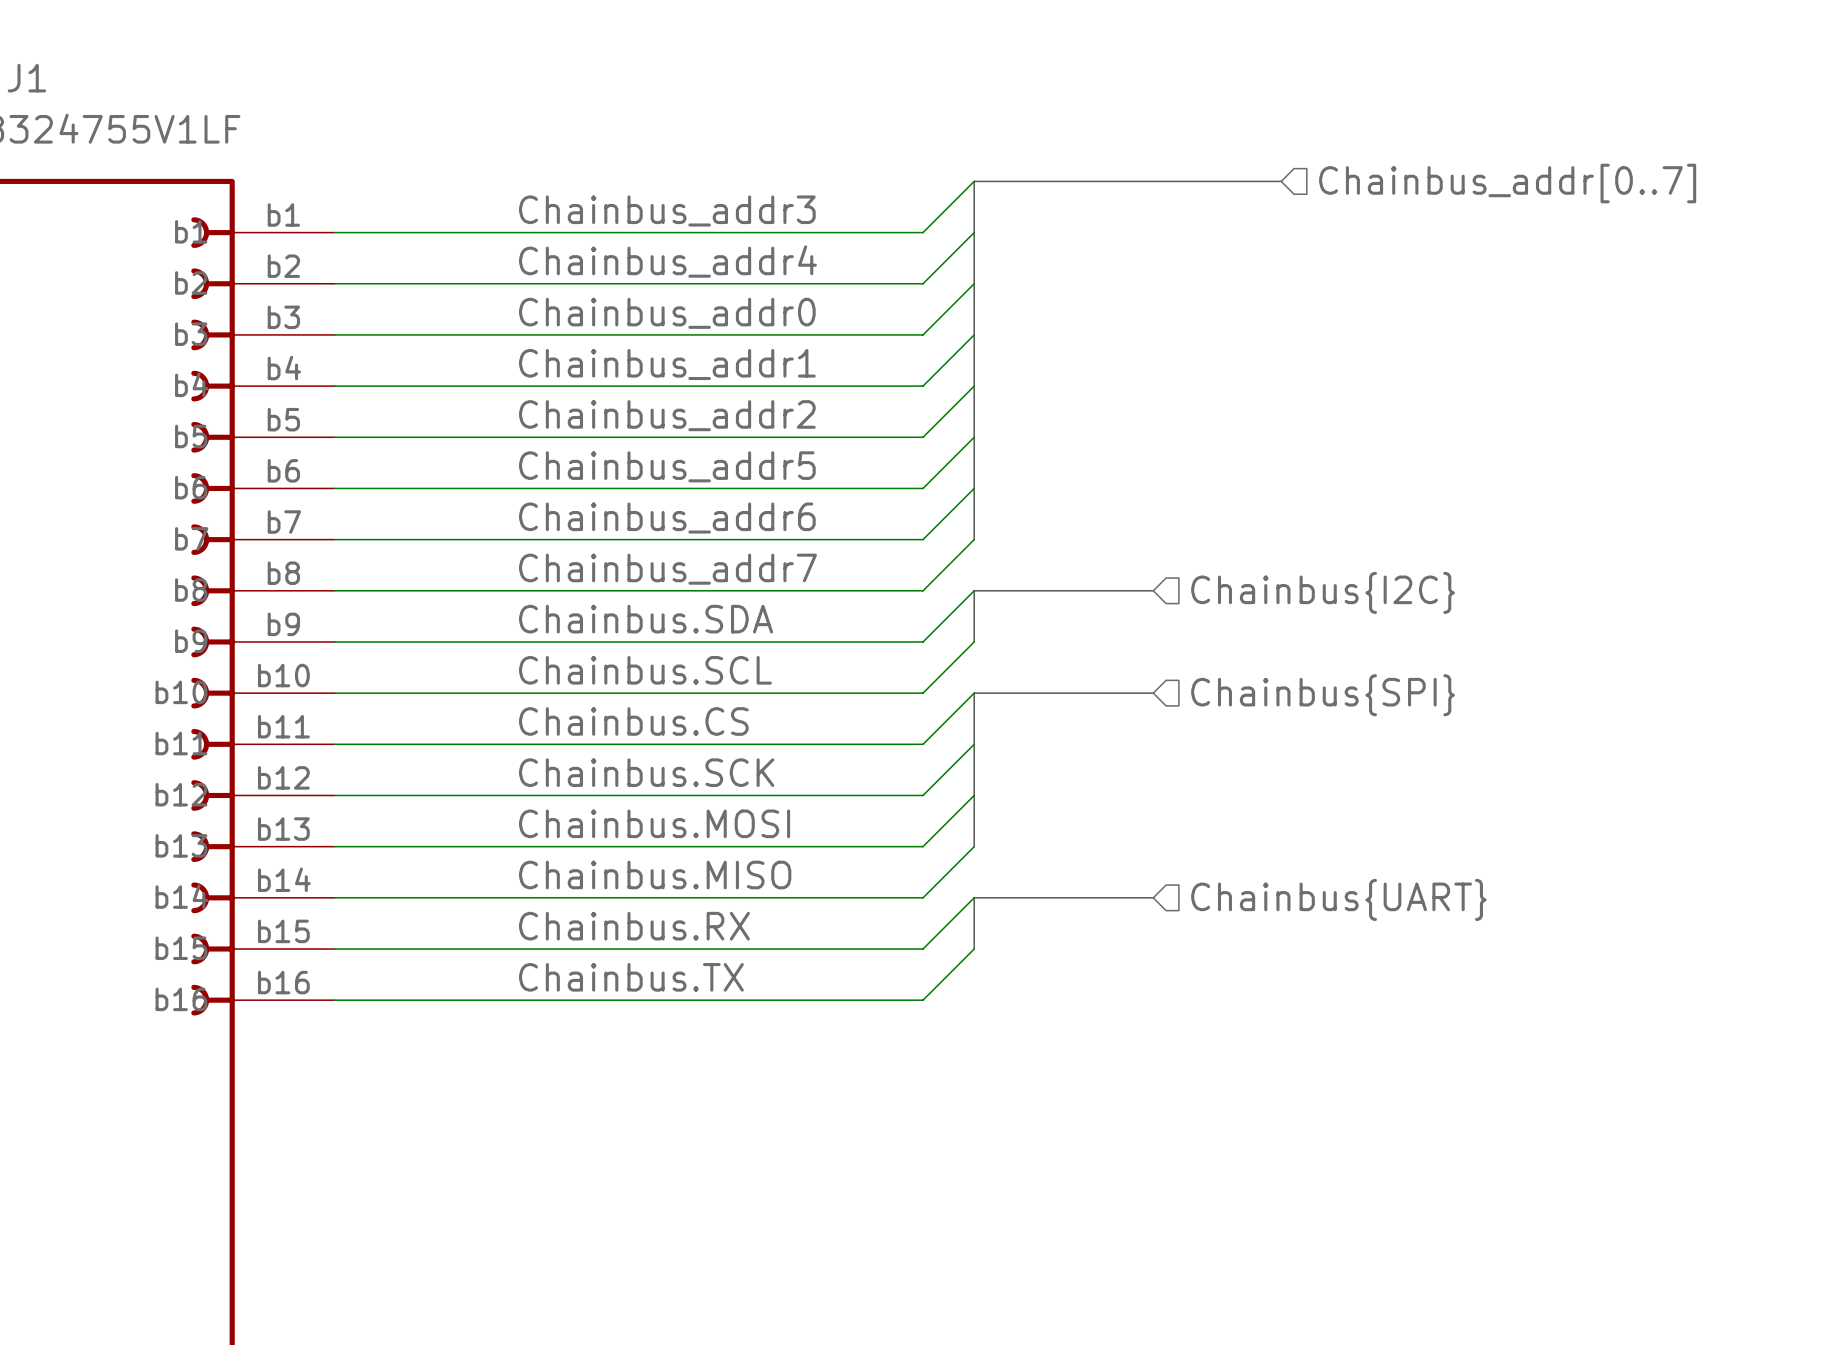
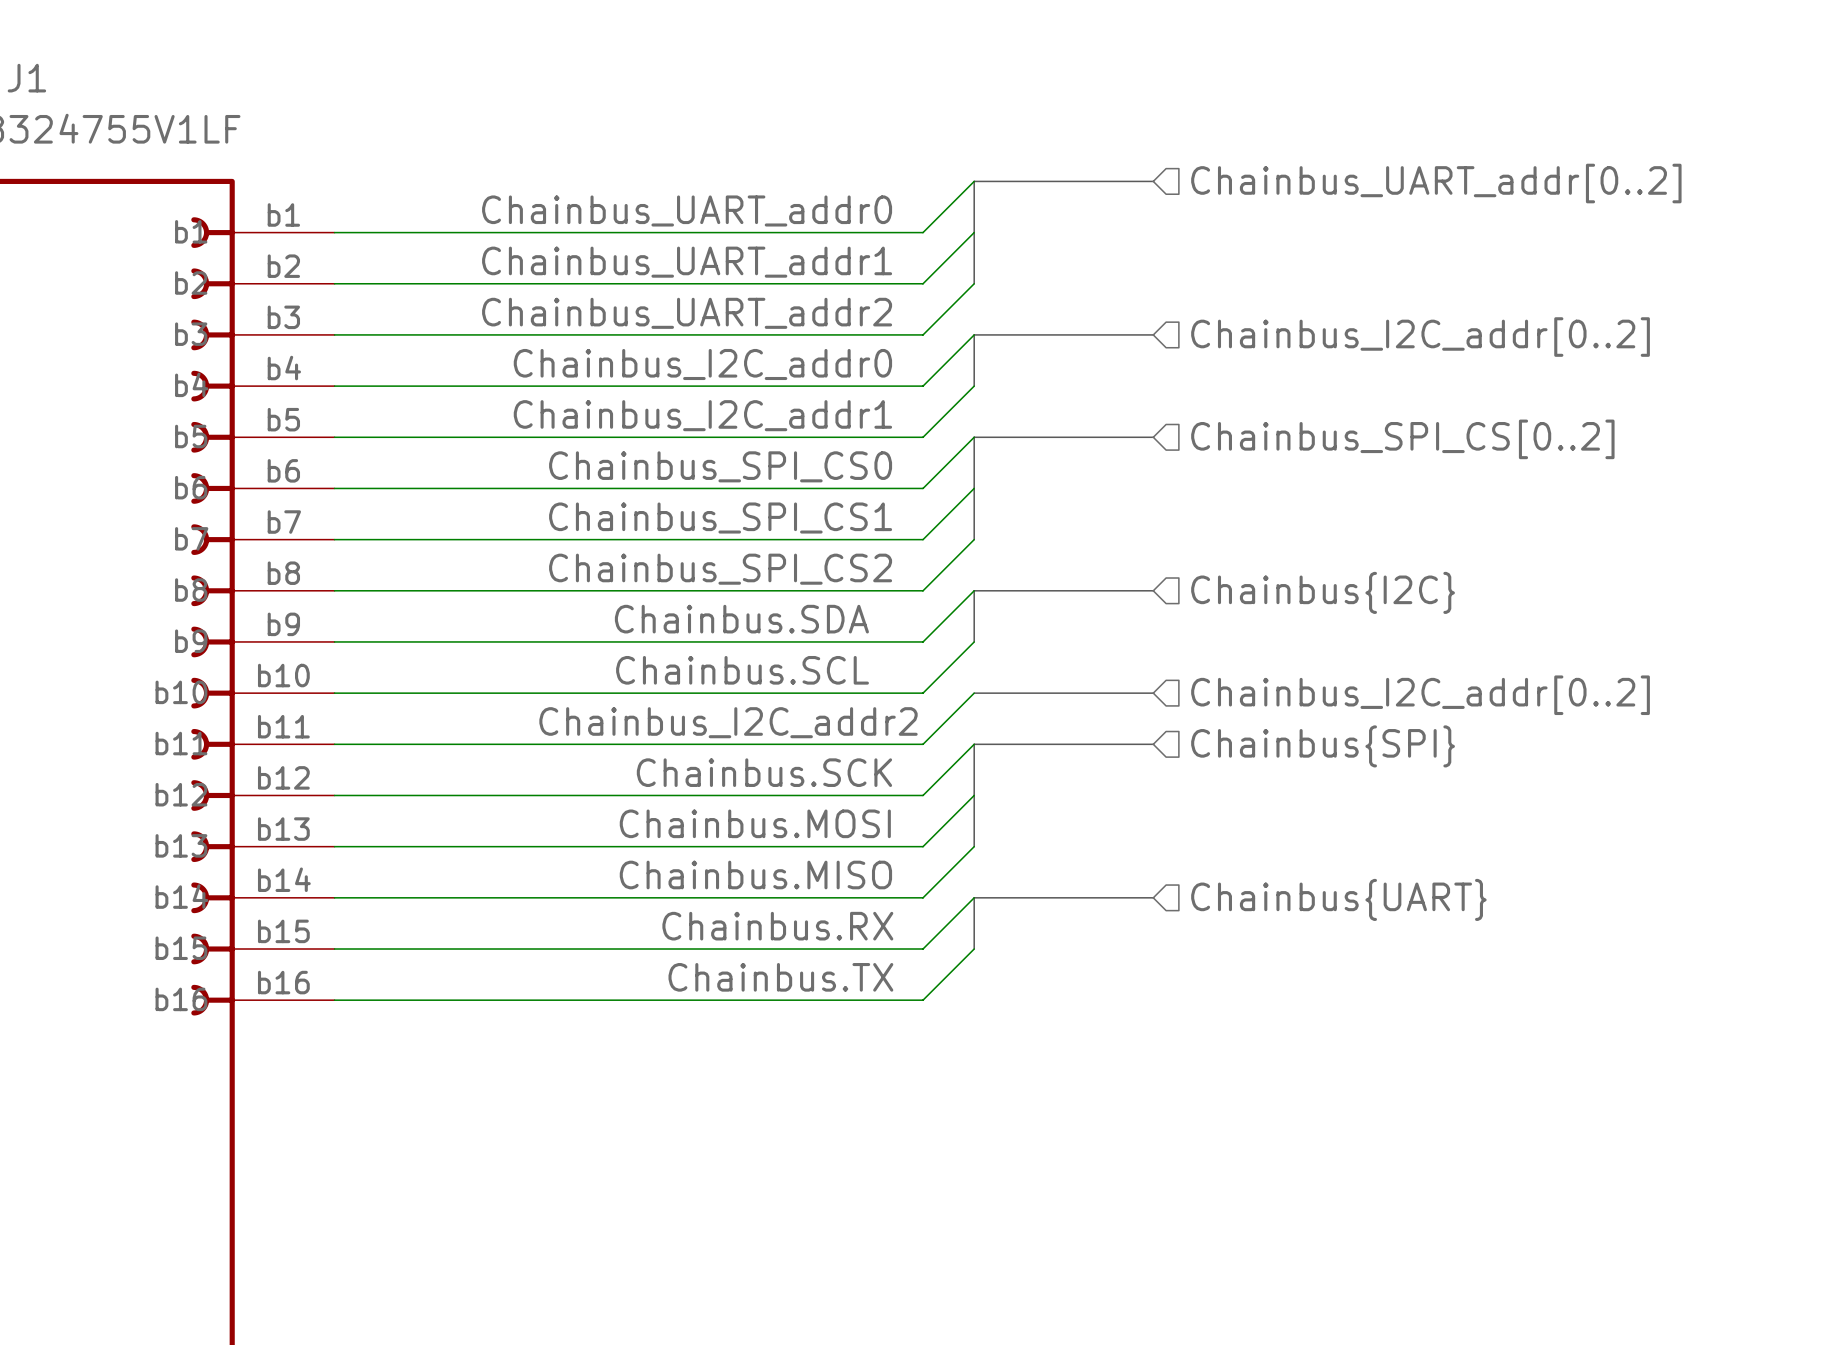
bus: (1153, 181) (1281, 181) -> none
hierarchical label: Chainbus_addr[0..7] (1507, 183) -> Chainbus_UART_addr[0..2] (1436, 183)
label: Chainbus_addr3 (667, 210) -> none
label: none -> Chainbus_UART_addr0 (687, 210)
label: Chainbus_addr4 (667, 261) -> none
label: none -> Chainbus_UART_addr1 (687, 262)
bus: (974, 283) (974, 334) -> (1153, 334) (974, 334)
label: Chainbus_addr0 (667, 313) -> none
label: none -> Chainbus_UART_addr2 (687, 313)
hierarchical label: none -> Chainbus_I2C_addr[0..2] (1420, 337)
label: Chainbus_addr1 (667, 364) -> none
label: none -> Chainbus_I2C_addr0 (702, 364)
bus: (974, 386) (974, 437) -> (1153, 437) (974, 437)
label: Chainbus_addr2 (667, 415) -> none
label: none -> Chainbus_I2C_addr1 (702, 415)
hierarchical label: none -> Chainbus_SPI_CS[0..2] (1402, 439)
label: Chainbus_addr5 (667, 466) -> none
label: none -> Chainbus_SPI_CS0 (720, 466)
label: Chainbus_addr6 (667, 518) -> none
label: none -> Chainbus_SPI_CS1 (720, 518)
label: Chainbus_addr7 (667, 569) -> none
label: none -> Chainbus_SPI_CS2 (720, 569)
label position: Chainbus.SDA (646, 619) -> Chainbus.SDA (741, 619)
label position: Chainbus.SCL (645, 670) -> Chainbus.SCL (742, 670)
bus: (974, 693) (974, 744) -> (1153, 744) (974, 744)
hierarchical label: Chainbus{SPI} (1323, 695) -> Chainbus_I2C_addr[0..2] (1420, 695)
label: Chainbus.CS (633, 721) -> Chainbus_I2C_addr2 (728, 722)
hierarchical label: none -> Chainbus{SPI} (1323, 746)
label position: Chainbus.SCK (646, 772) -> Chainbus.SCK (764, 772)
label position: Chainbus.MOSI (654, 823) -> Chainbus.MOSI (755, 823)
label position: Chainbus.MISO (655, 875) -> Chainbus.MISO (755, 875)
label position: Chainbus.RX (634, 926) -> Chainbus.RX (777, 926)
label position: Chainbus.TX (631, 977) -> Chainbus.TX (780, 977)

